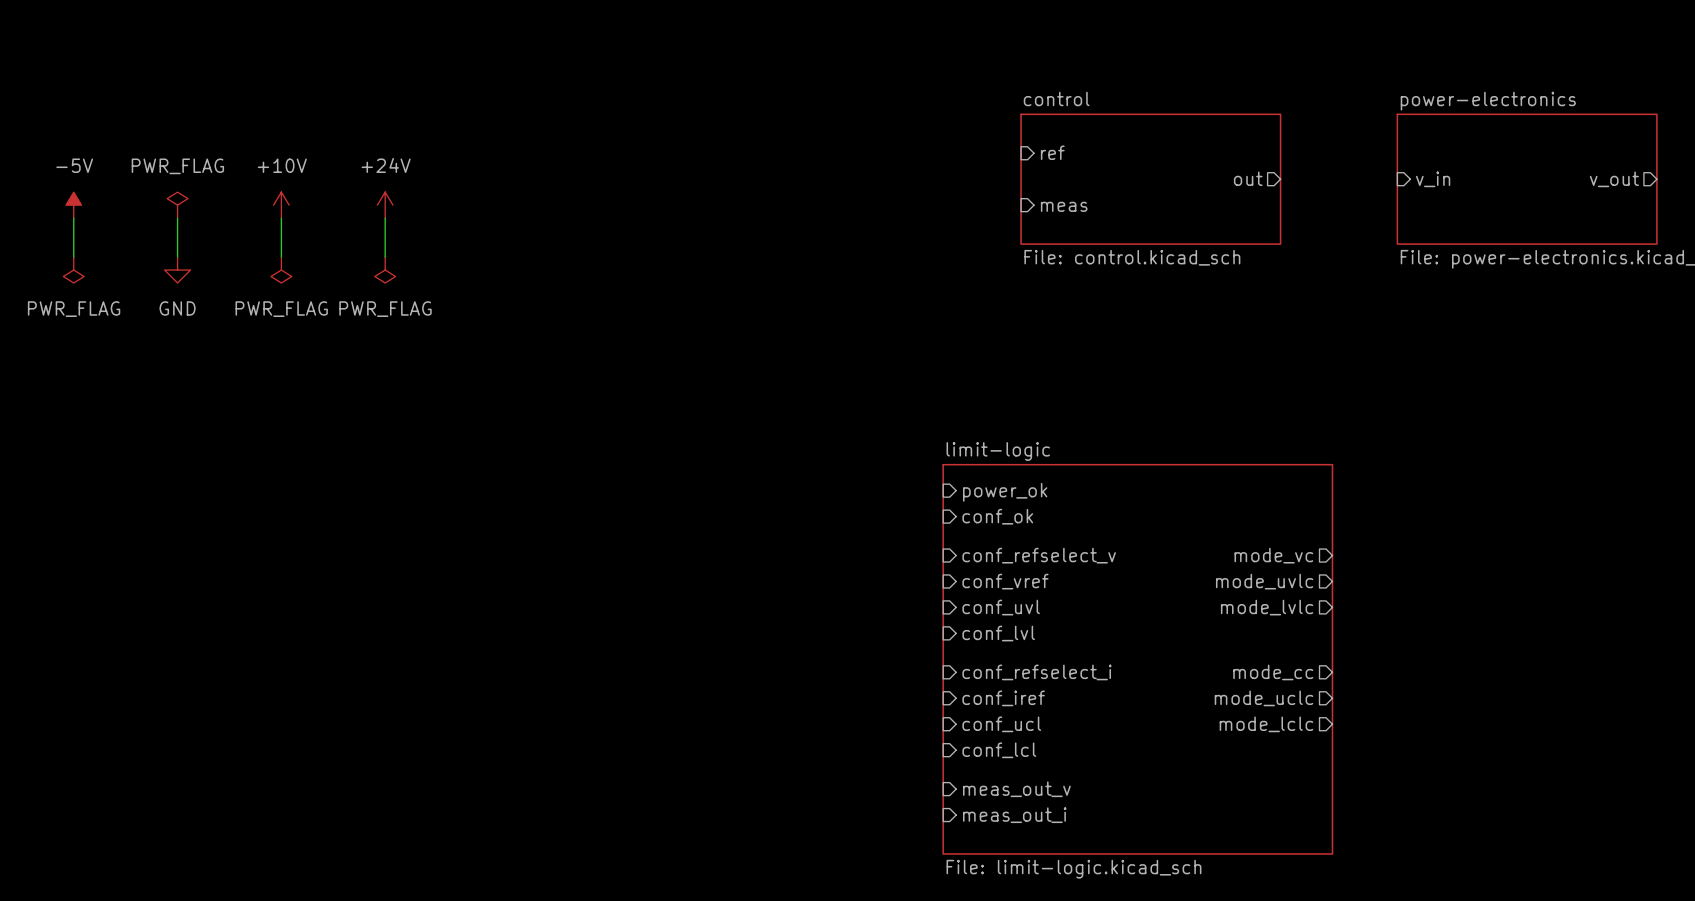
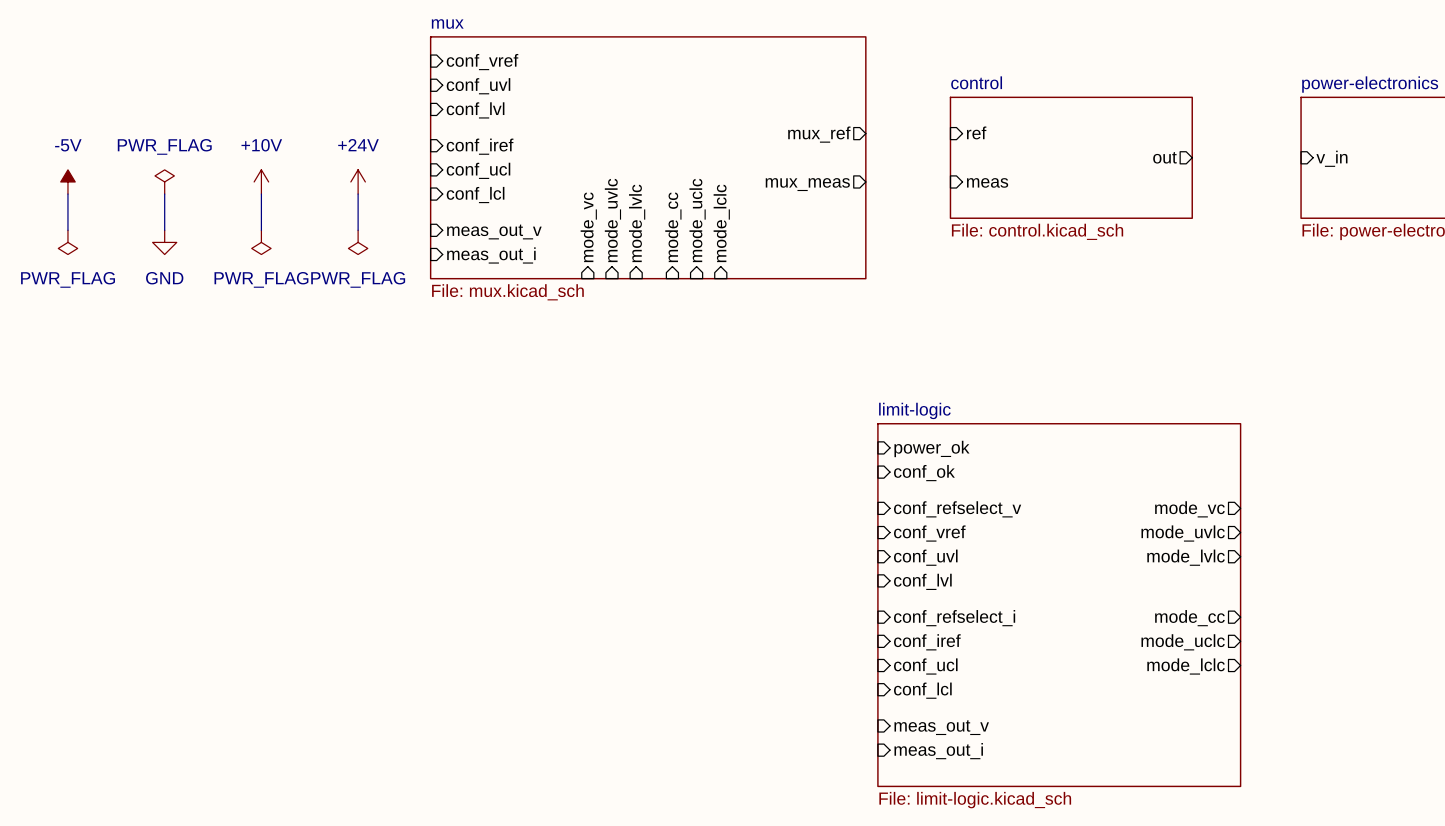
sheet pin: none -> conf_vref (482, 62)
sheet pin: none -> conf_uvl (478, 86)
sheet pin: none -> conf_lvl (475, 110)
sheet pin: none -> mux_ref (819, 134)
sheet pin: none -> conf_iref (480, 146)
sheet mux: none -> File: mux.kicad_sch (648, 157)
sheet pin: none -> conf_ucl (478, 170)
sheet pin: none -> mux_meas (807, 184)
sheet pin: none -> conf_lcl (475, 195)
sheet pin: none -> mode_uclc (697, 220)
sheet pin: none -> mode_uvlc (612, 220)
sheet pin: none -> mode_lvlc (637, 223)
sheet pin: none -> mode_lclc (721, 223)
sheet pin: none -> mode_vc (588, 227)
sheet pin: none -> mode_cc (673, 227)
sheet pin: none -> meas_out_v (494, 231)
sheet pin: none -> meas_out_i (491, 255)

